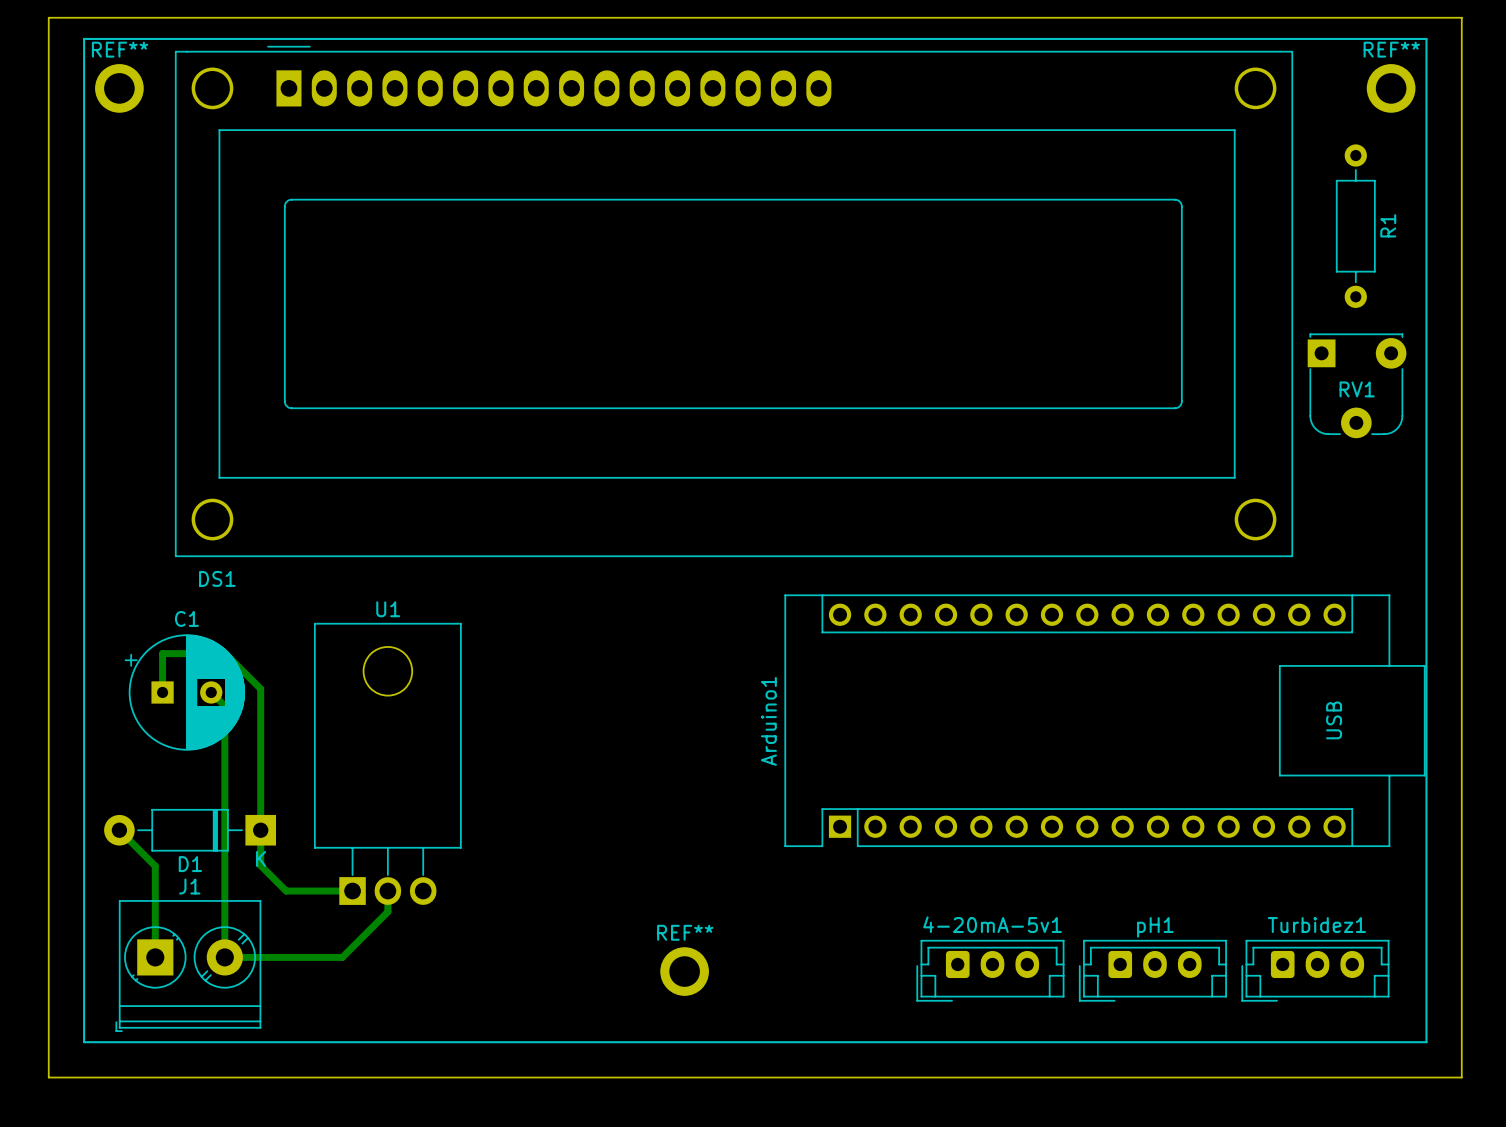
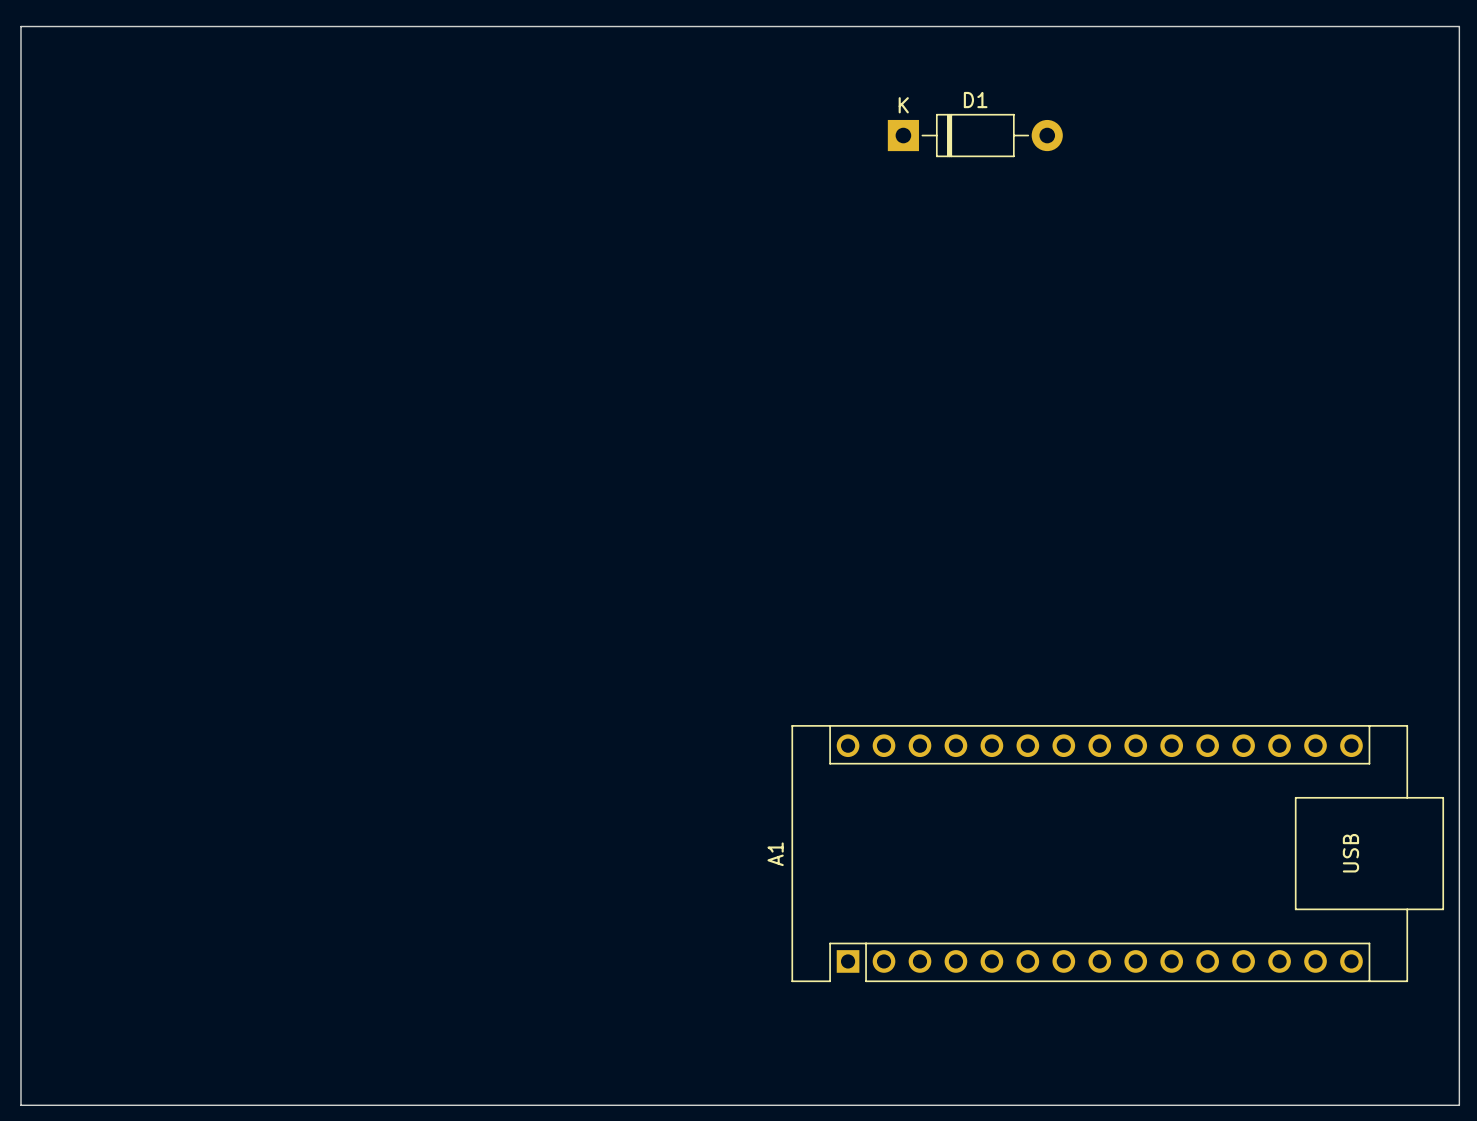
line: (84, 38) (1426, 38) (1426, 1042) (84, 1042) (84, 38) -> none
REF**: (119, 88) -> none
REF**: (1391, 88) -> none
R1: (1355, 226) -> none
DS1: (734, 301) -> none
RV1: (1357, 385) -> none
bottom track: (162, 692) (162, 653) (225, 653) (260, 688) (260, 865) (286, 891) (352, 891) -> none
C1: (184, 692) -> none
bottom track: (211, 692) (224, 706) (224, 957) (342, 957) (387, 911) (387, 891) -> none
Arduino1: (1104, 720) -> none
U1: (387, 763) -> none
bottom track: (119, 830) (155, 866) (155, 957) -> none
D1 rotation: 0° (190, 830) -> 180° (975, 135)
D1 position: (190, 830) -> (975, 135)
A1: none -> (1117, 853)
J1: (188, 966) -> none
4-20mA-5v1: (990, 970) -> none
pH1: (1152, 970) -> none
Turbidez1: (1315, 970) -> none
REF**: (684, 971) -> none

